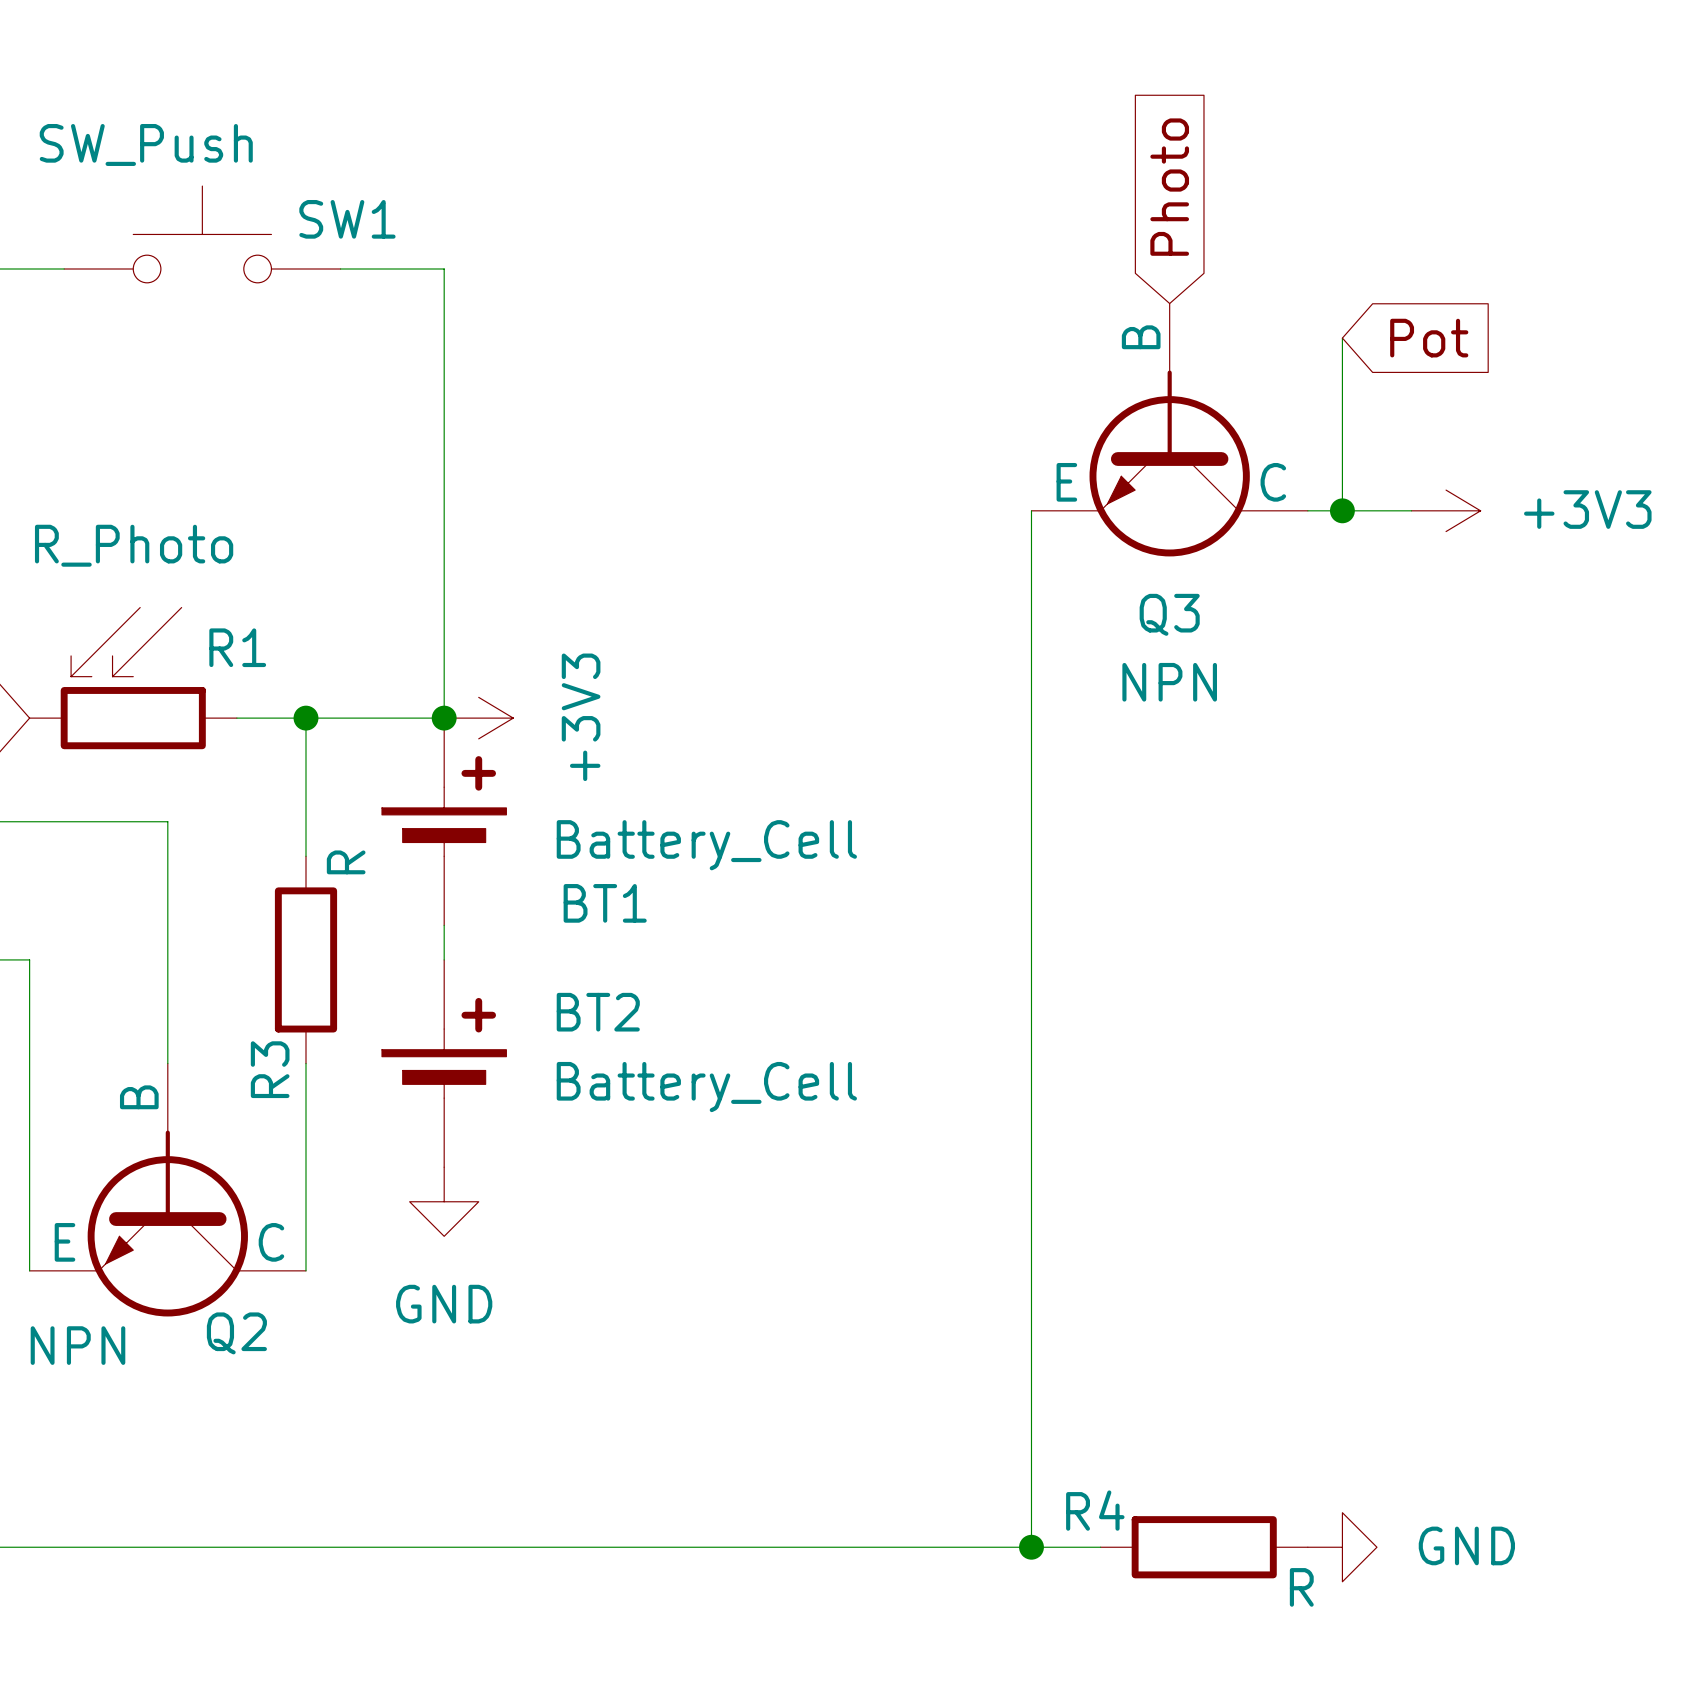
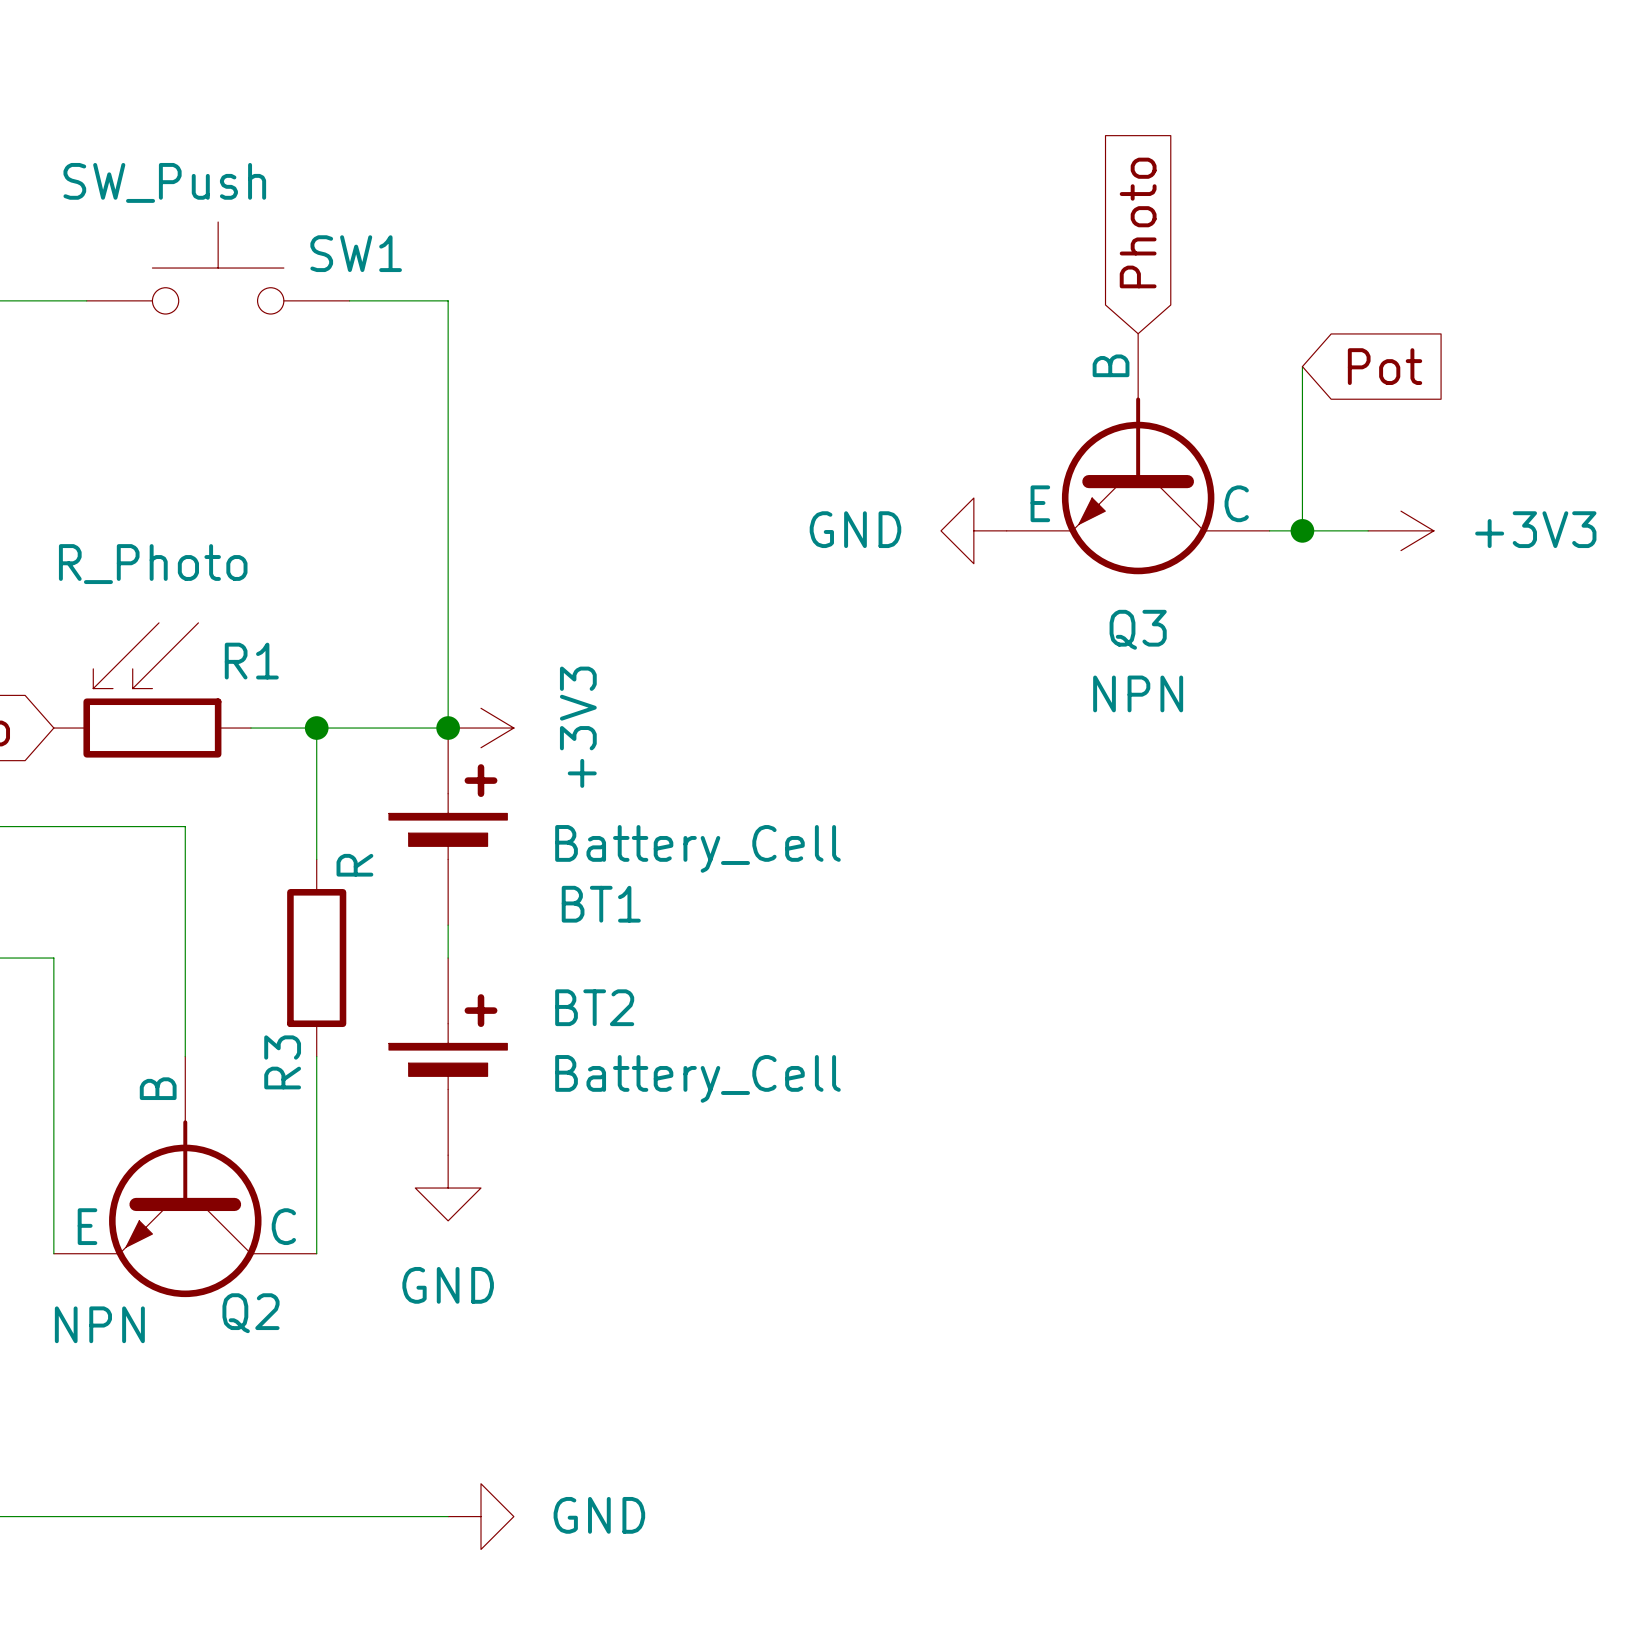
power symbol: none -> GND (973, 530)
wire: (1031, 510) (1031, 1547) -> none
wire: (444, 1547) (1100, 1547) -> none
power symbol: none -> GND (481, 1516)
junction: (1031, 1547) -> none
R4: R (1204, 1547) -> none
power symbol: GND (1342, 1547) -> none

